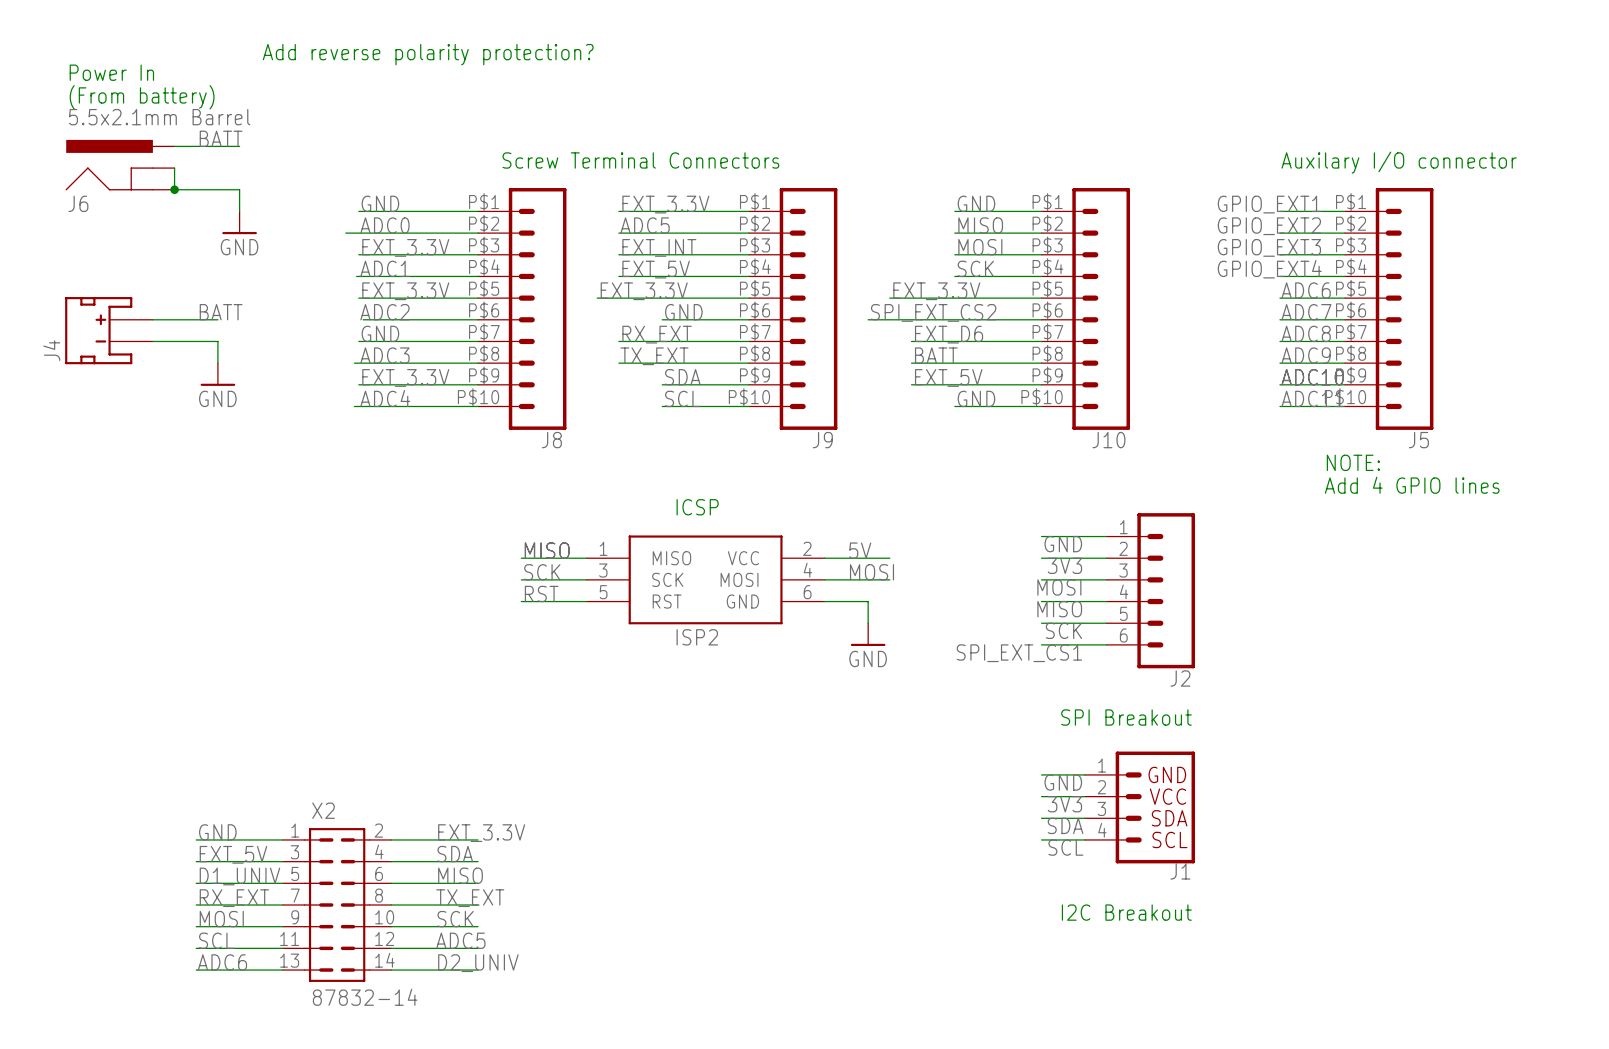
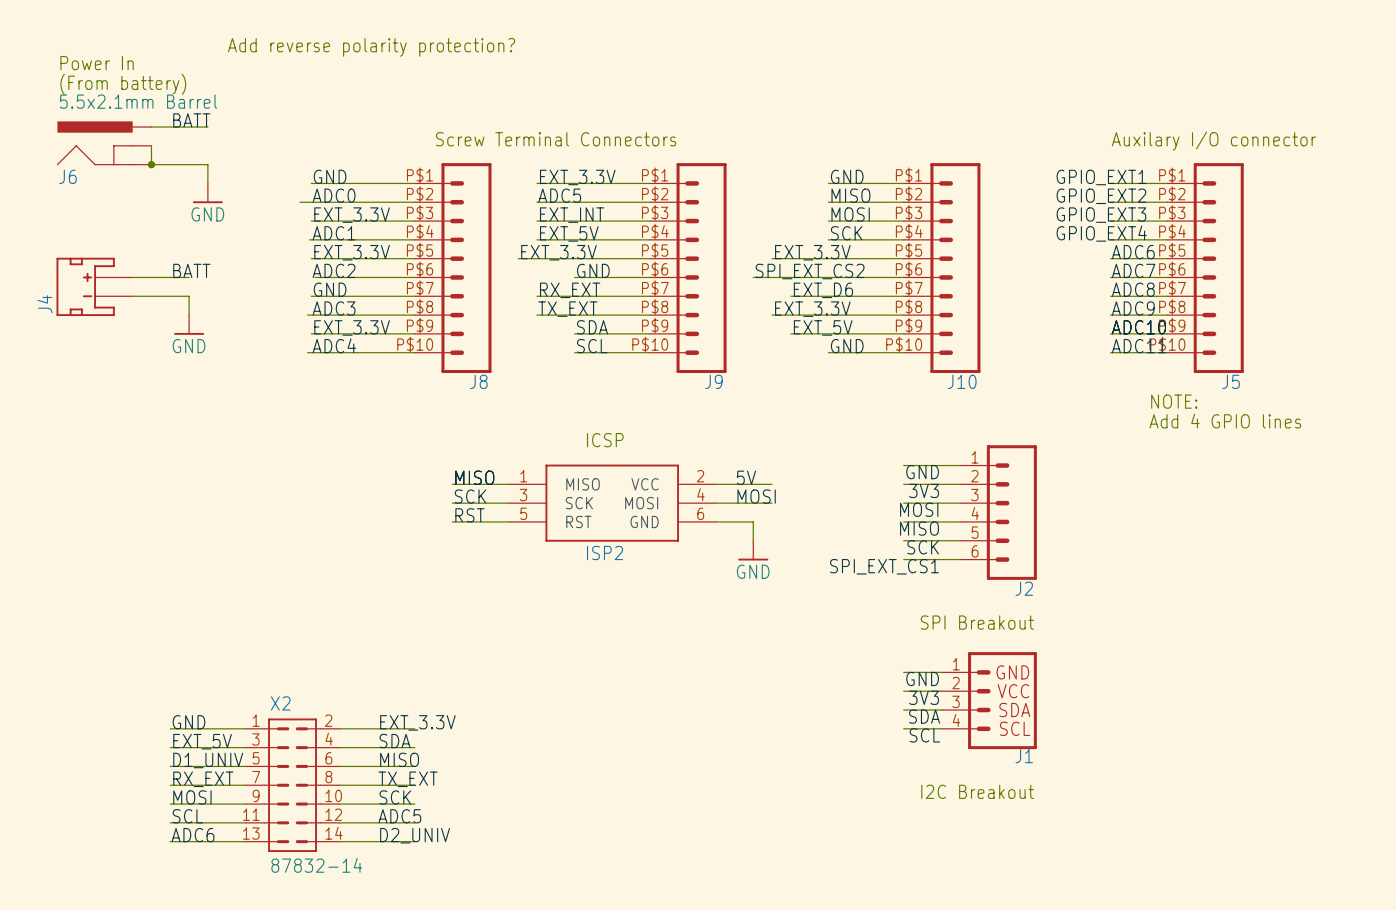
label: BATT (936, 355) -> none
label: none -> EXT_3.3V (812, 309)
wire: none -> (772, 315) (790, 315)

